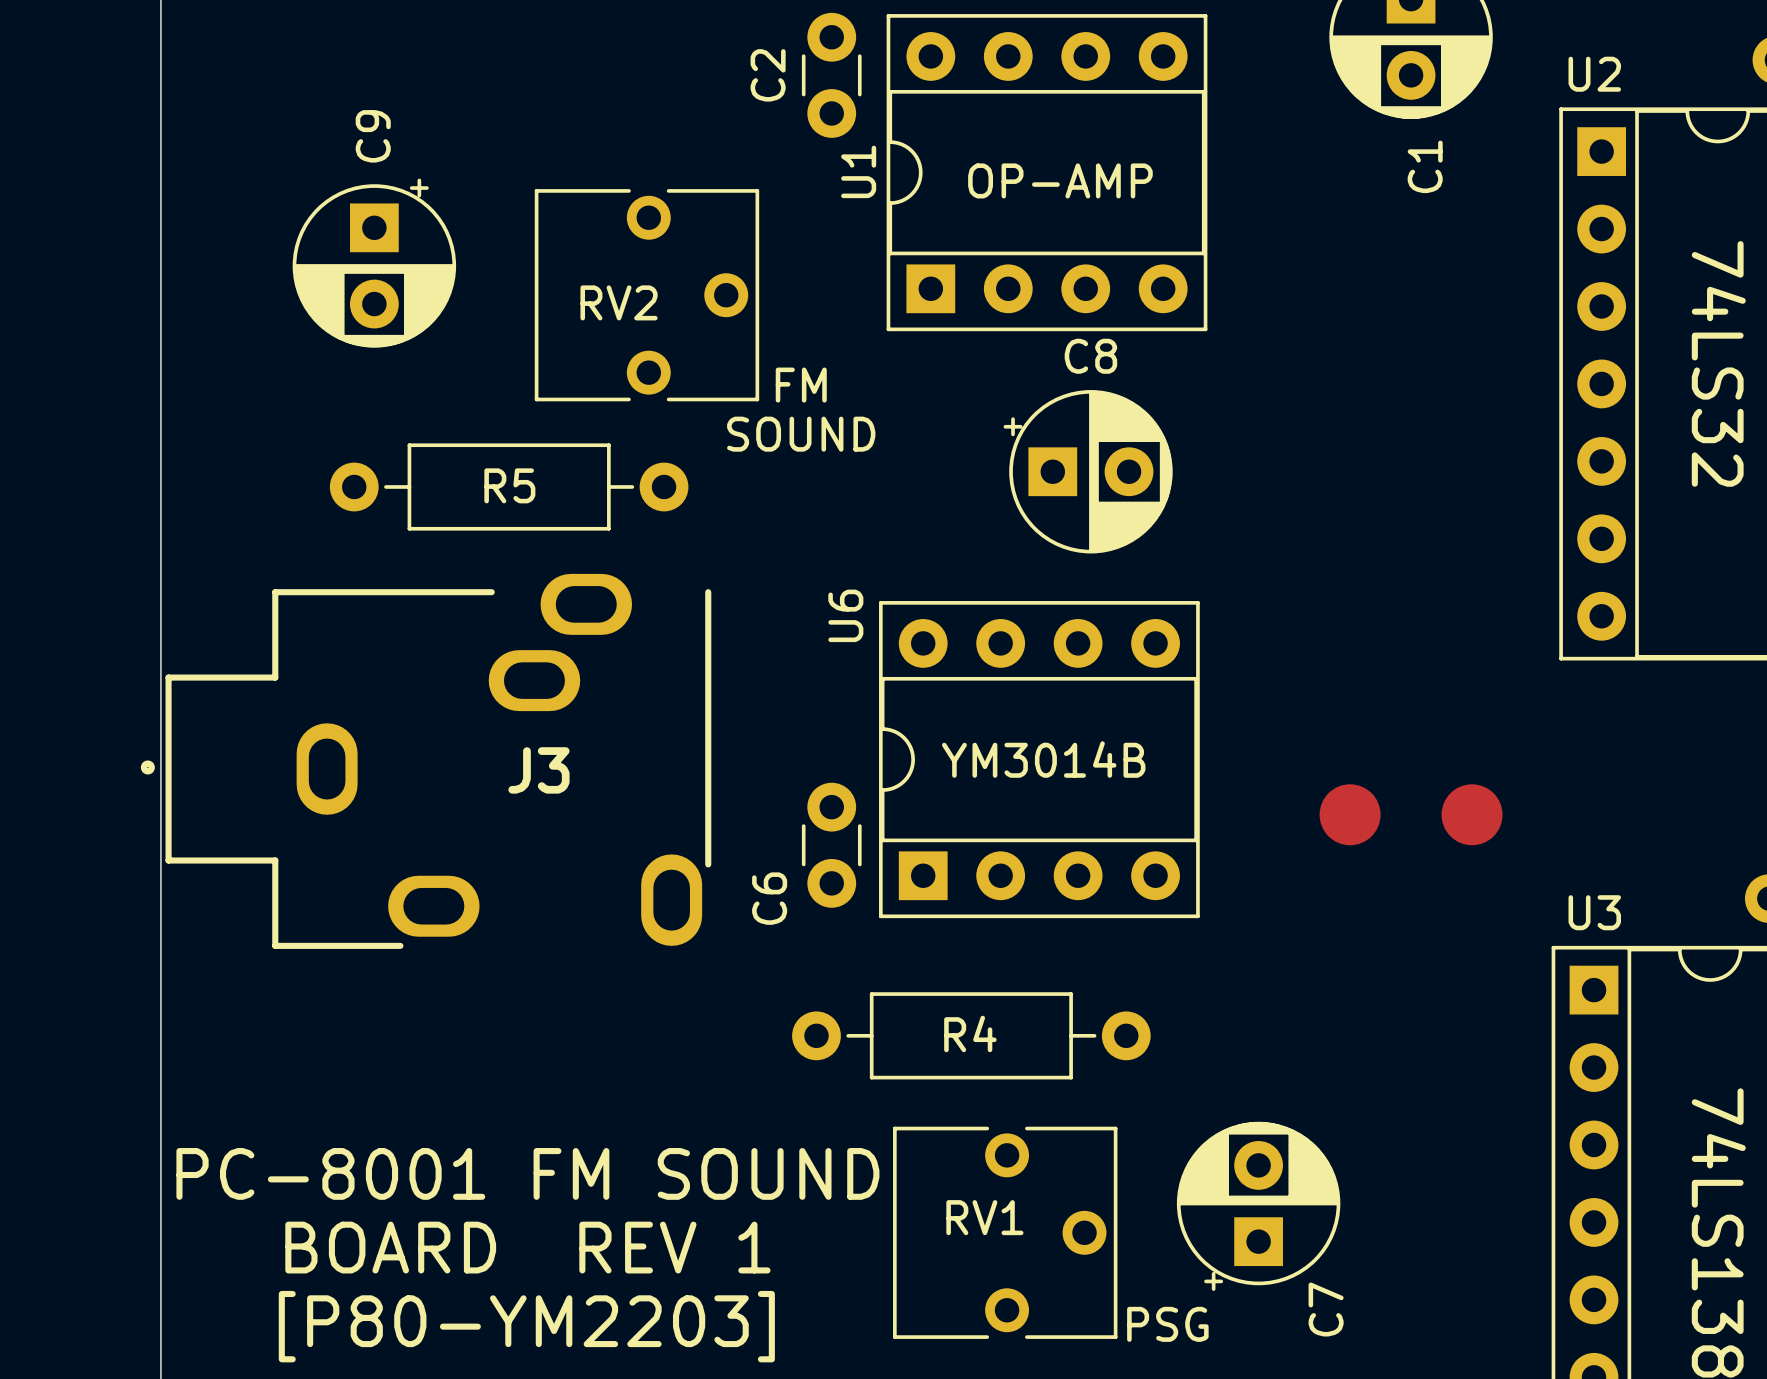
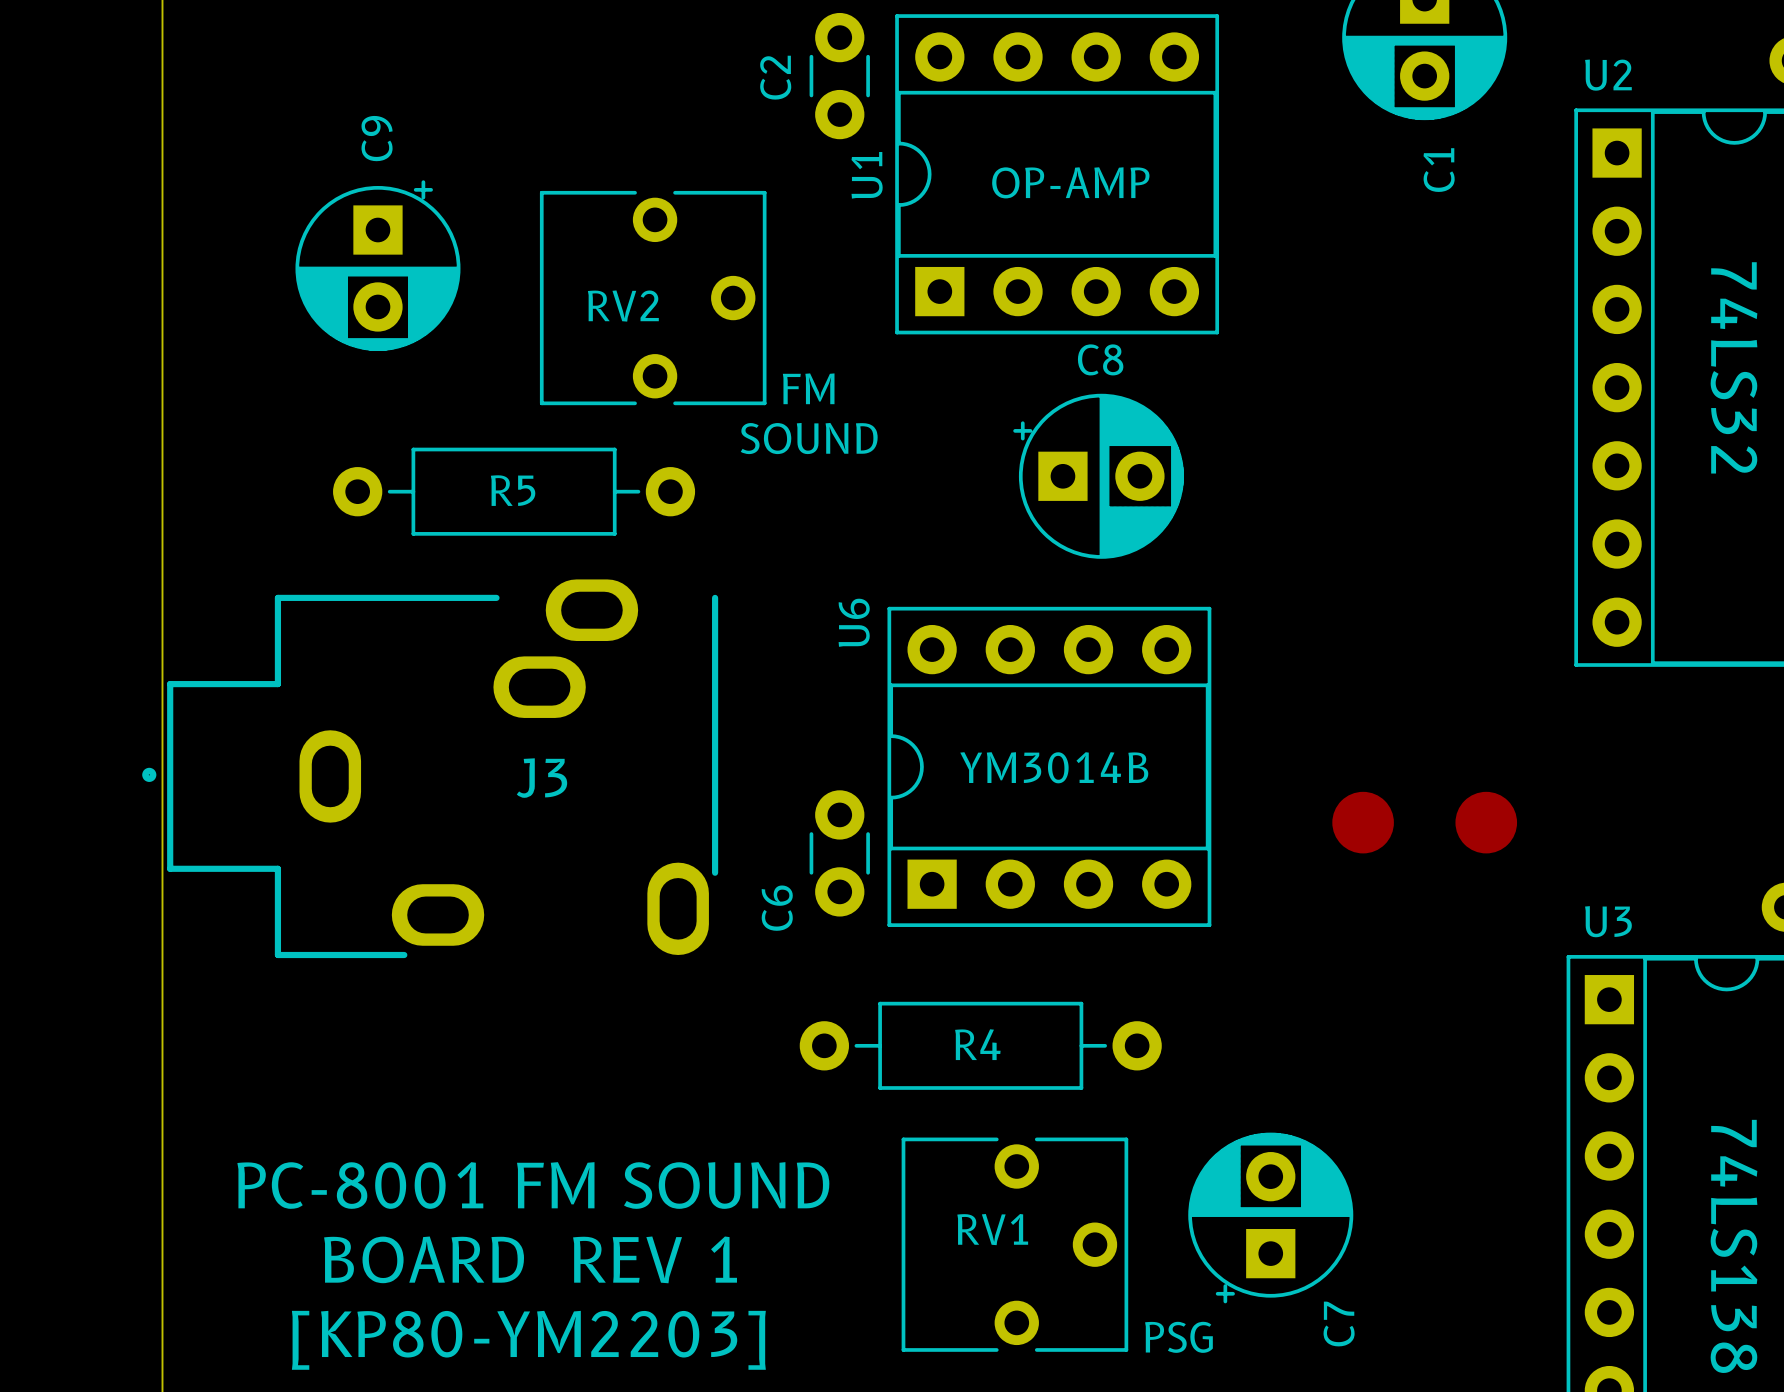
text: [P80-YM2203] (526, 1326) -> [KP80-YM2203] (528, 1340)

